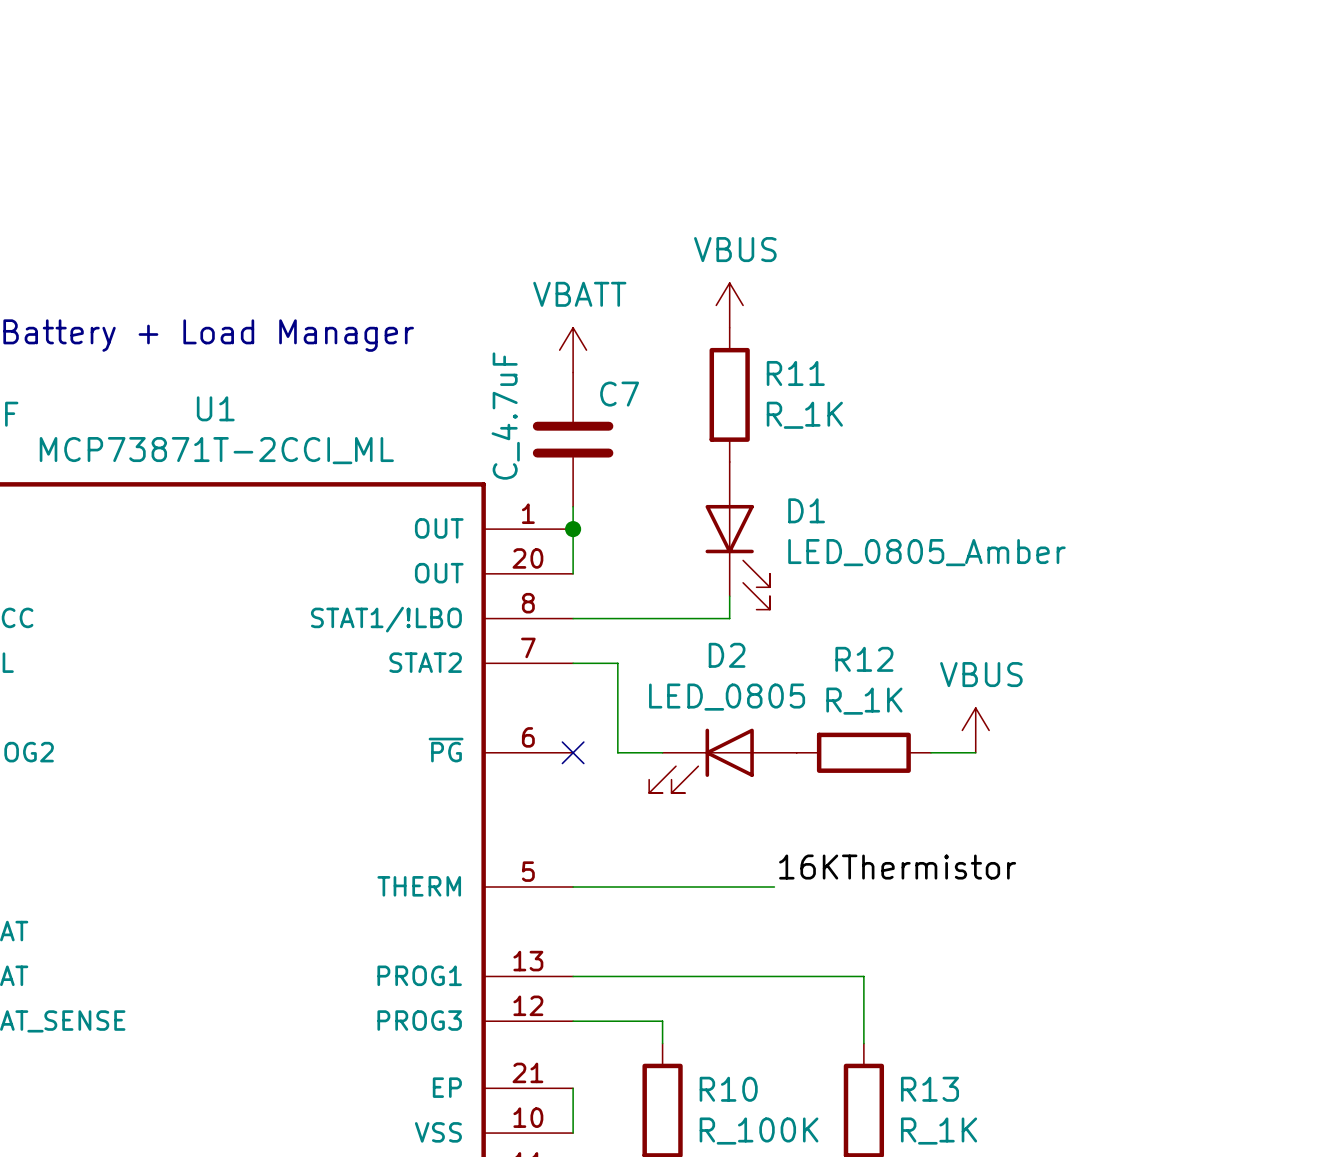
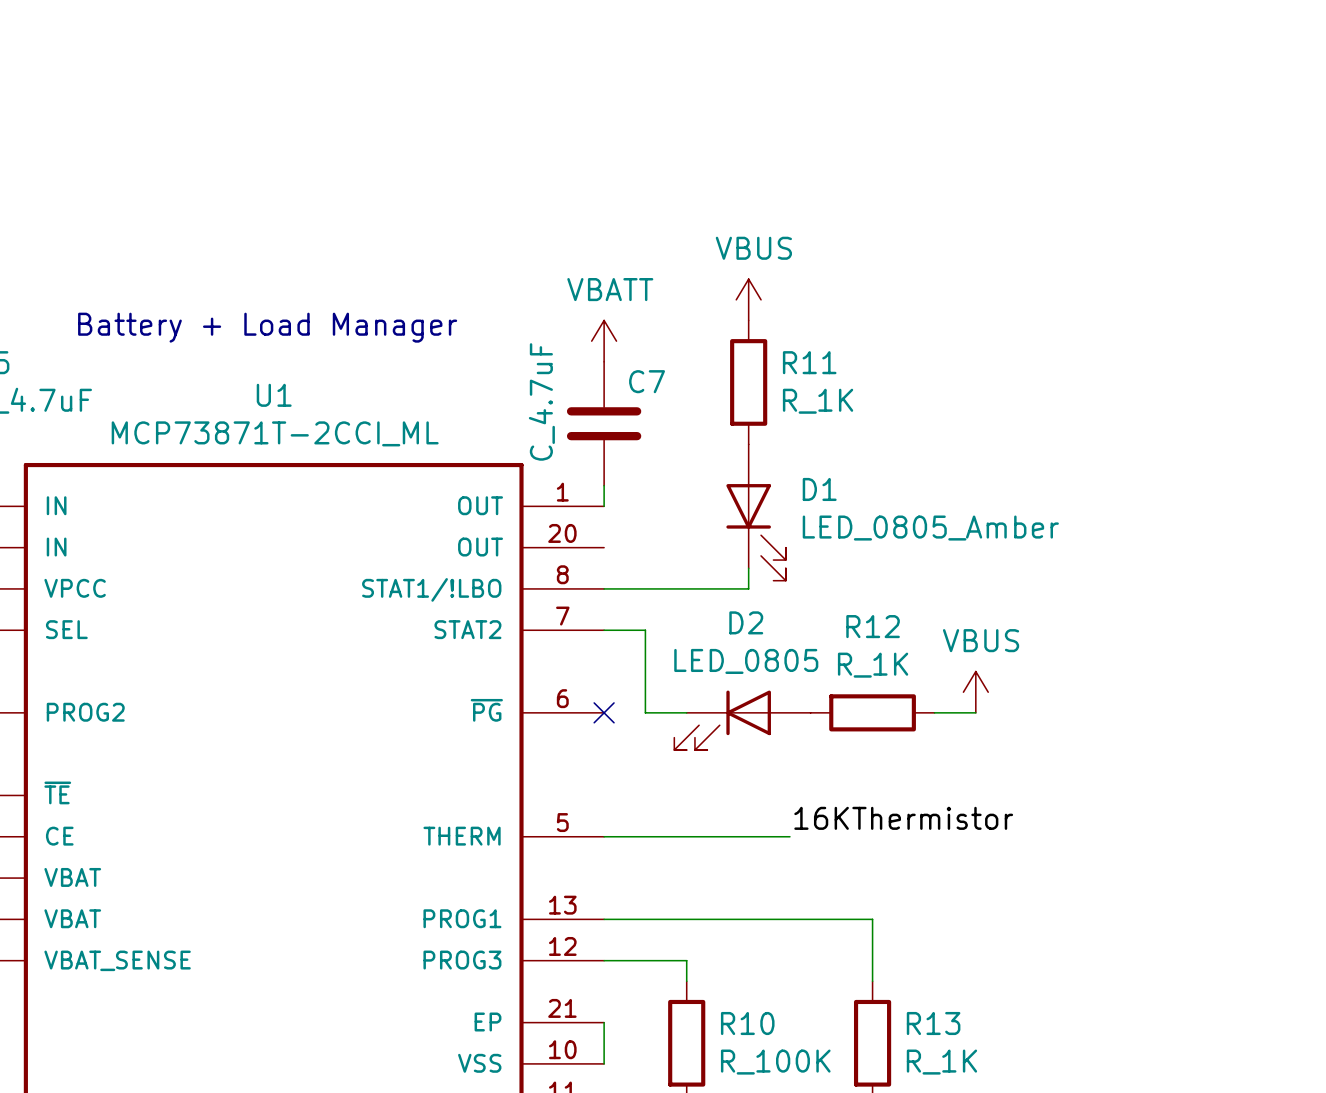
wire: (573, 529) (573, 573) -> none
junction: (573, 529) -> none

